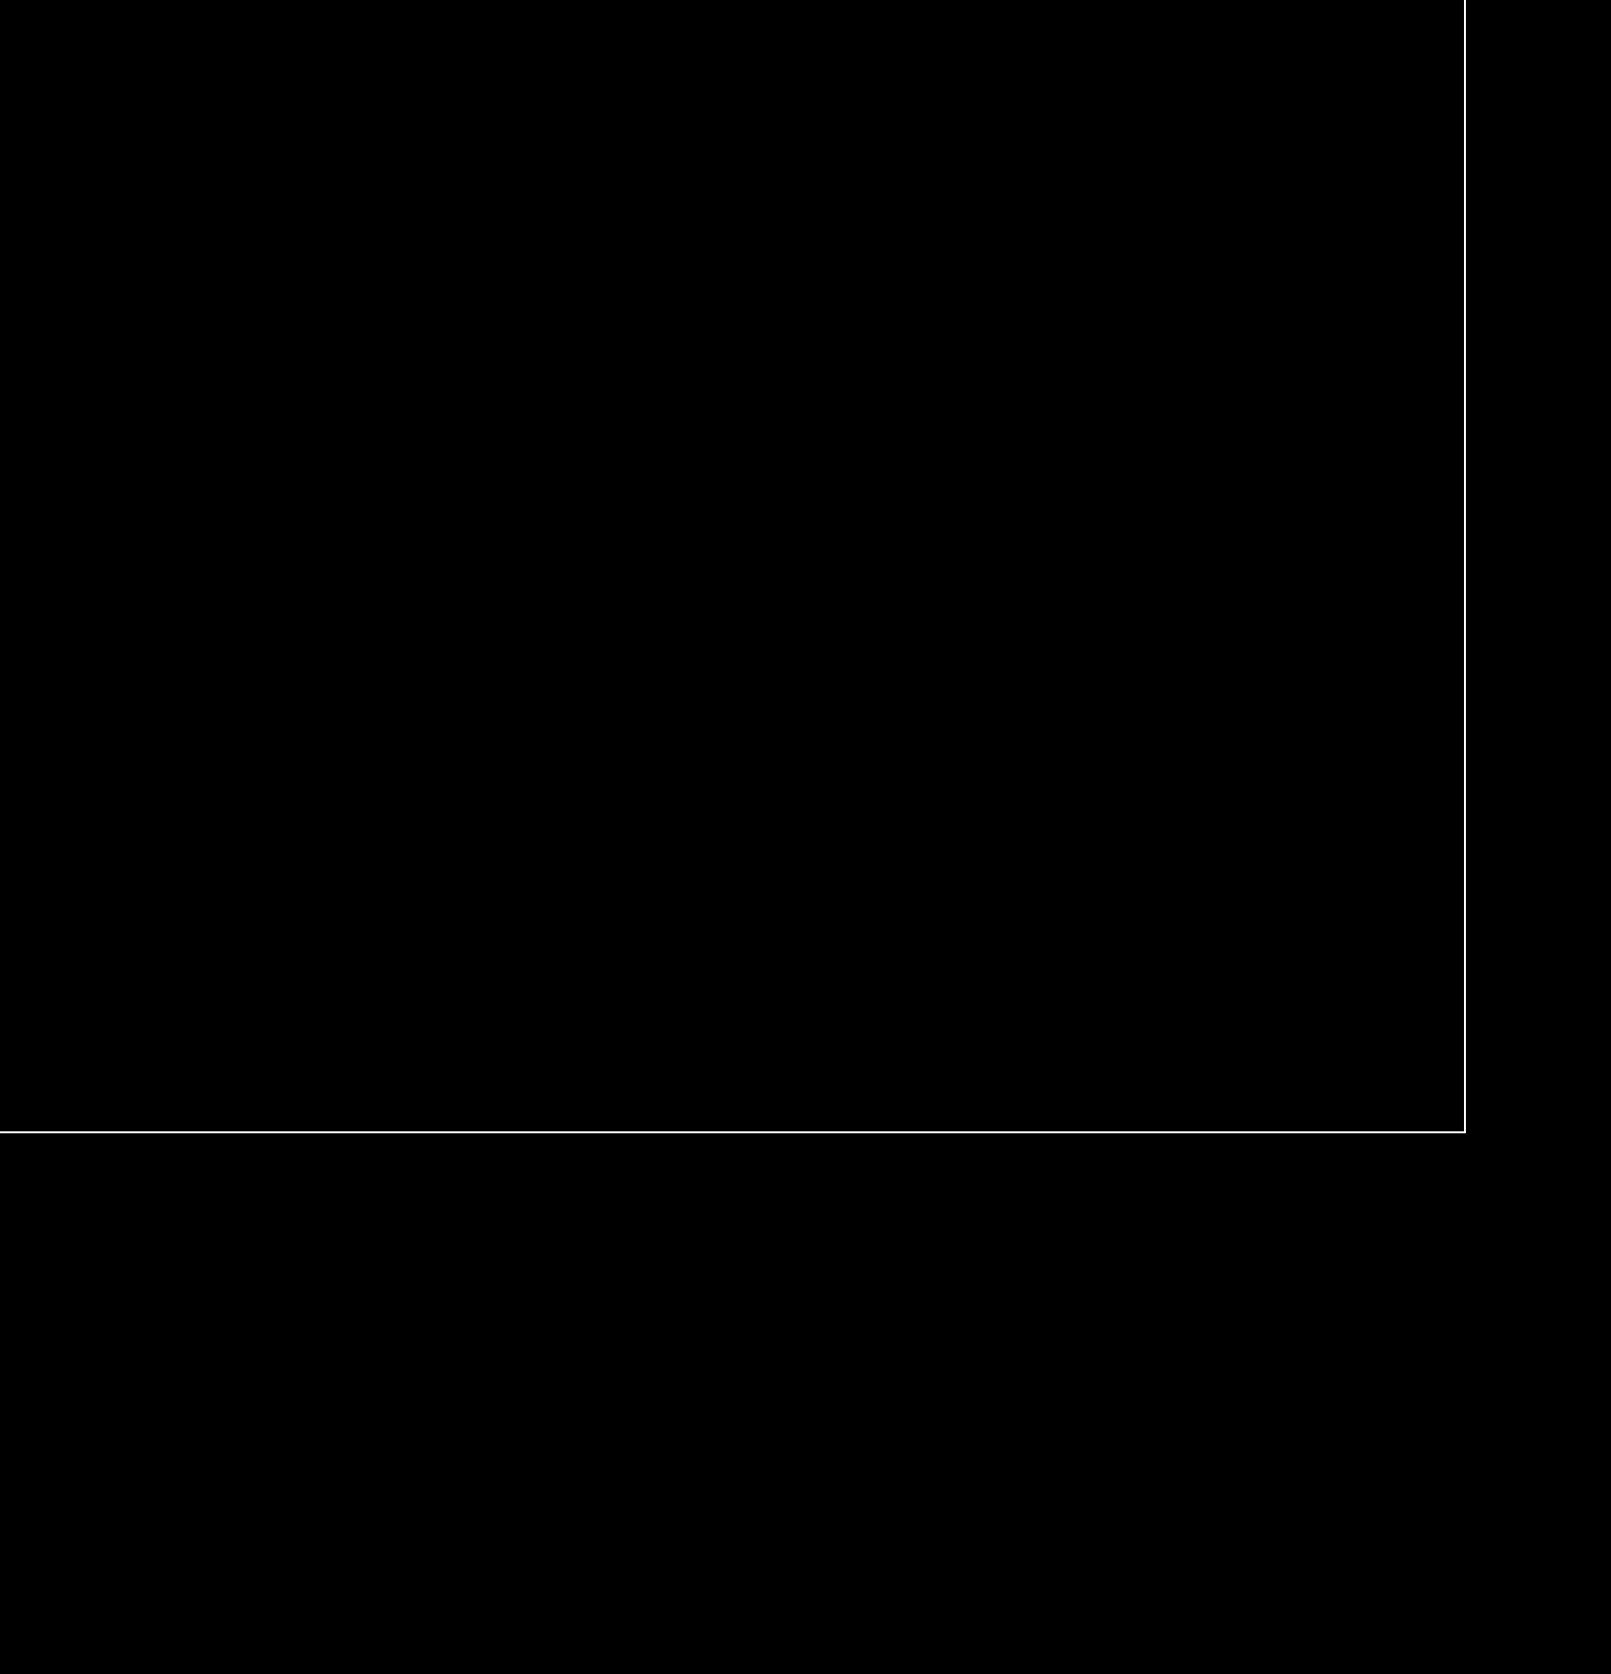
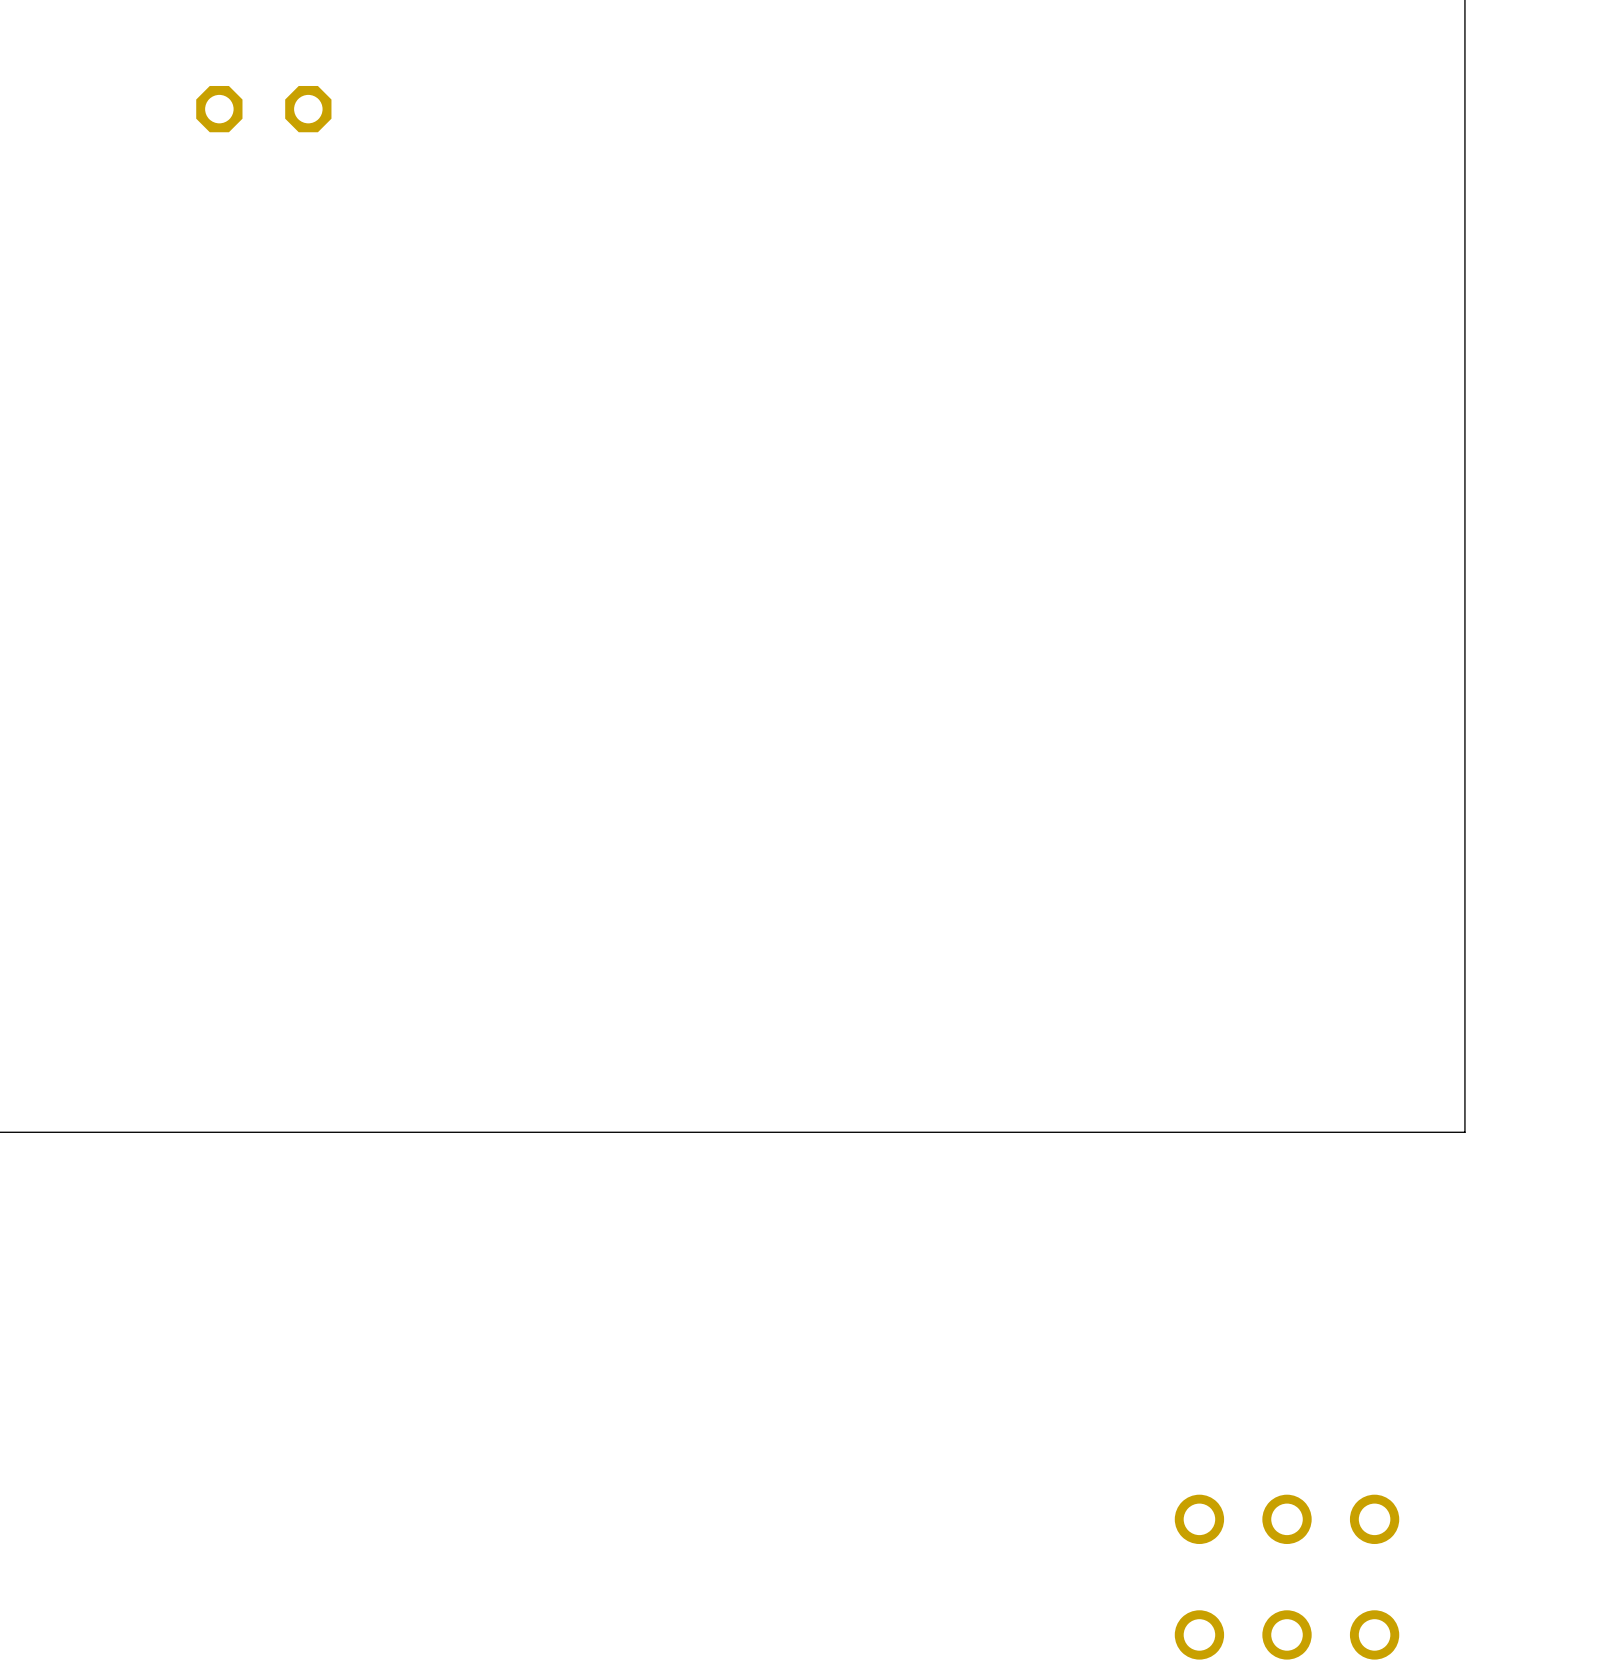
part: none -> (263, 109)
part: none -> (1287, 1577)

